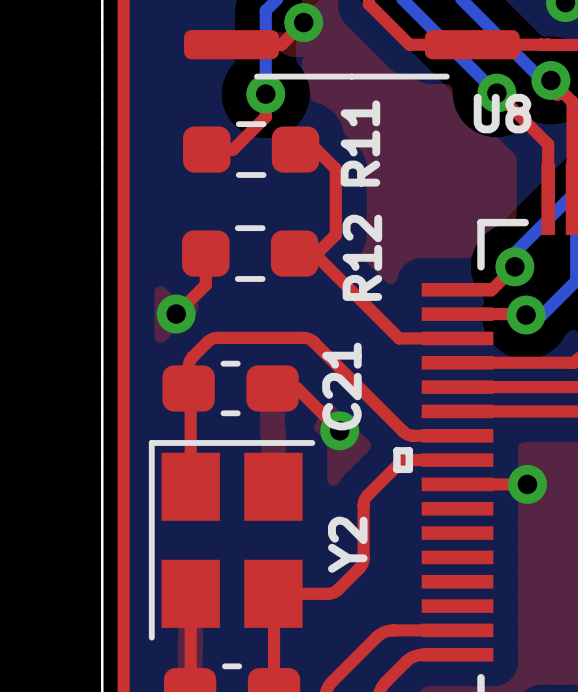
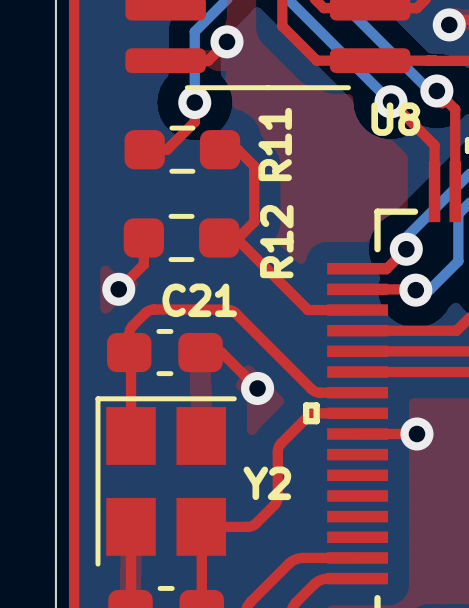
C21 name rotation: 0° (341, 386) -> 90° clockwise (199, 300)
Y2 name rotation: 0° (347, 544) -> 90° clockwise (267, 483)

